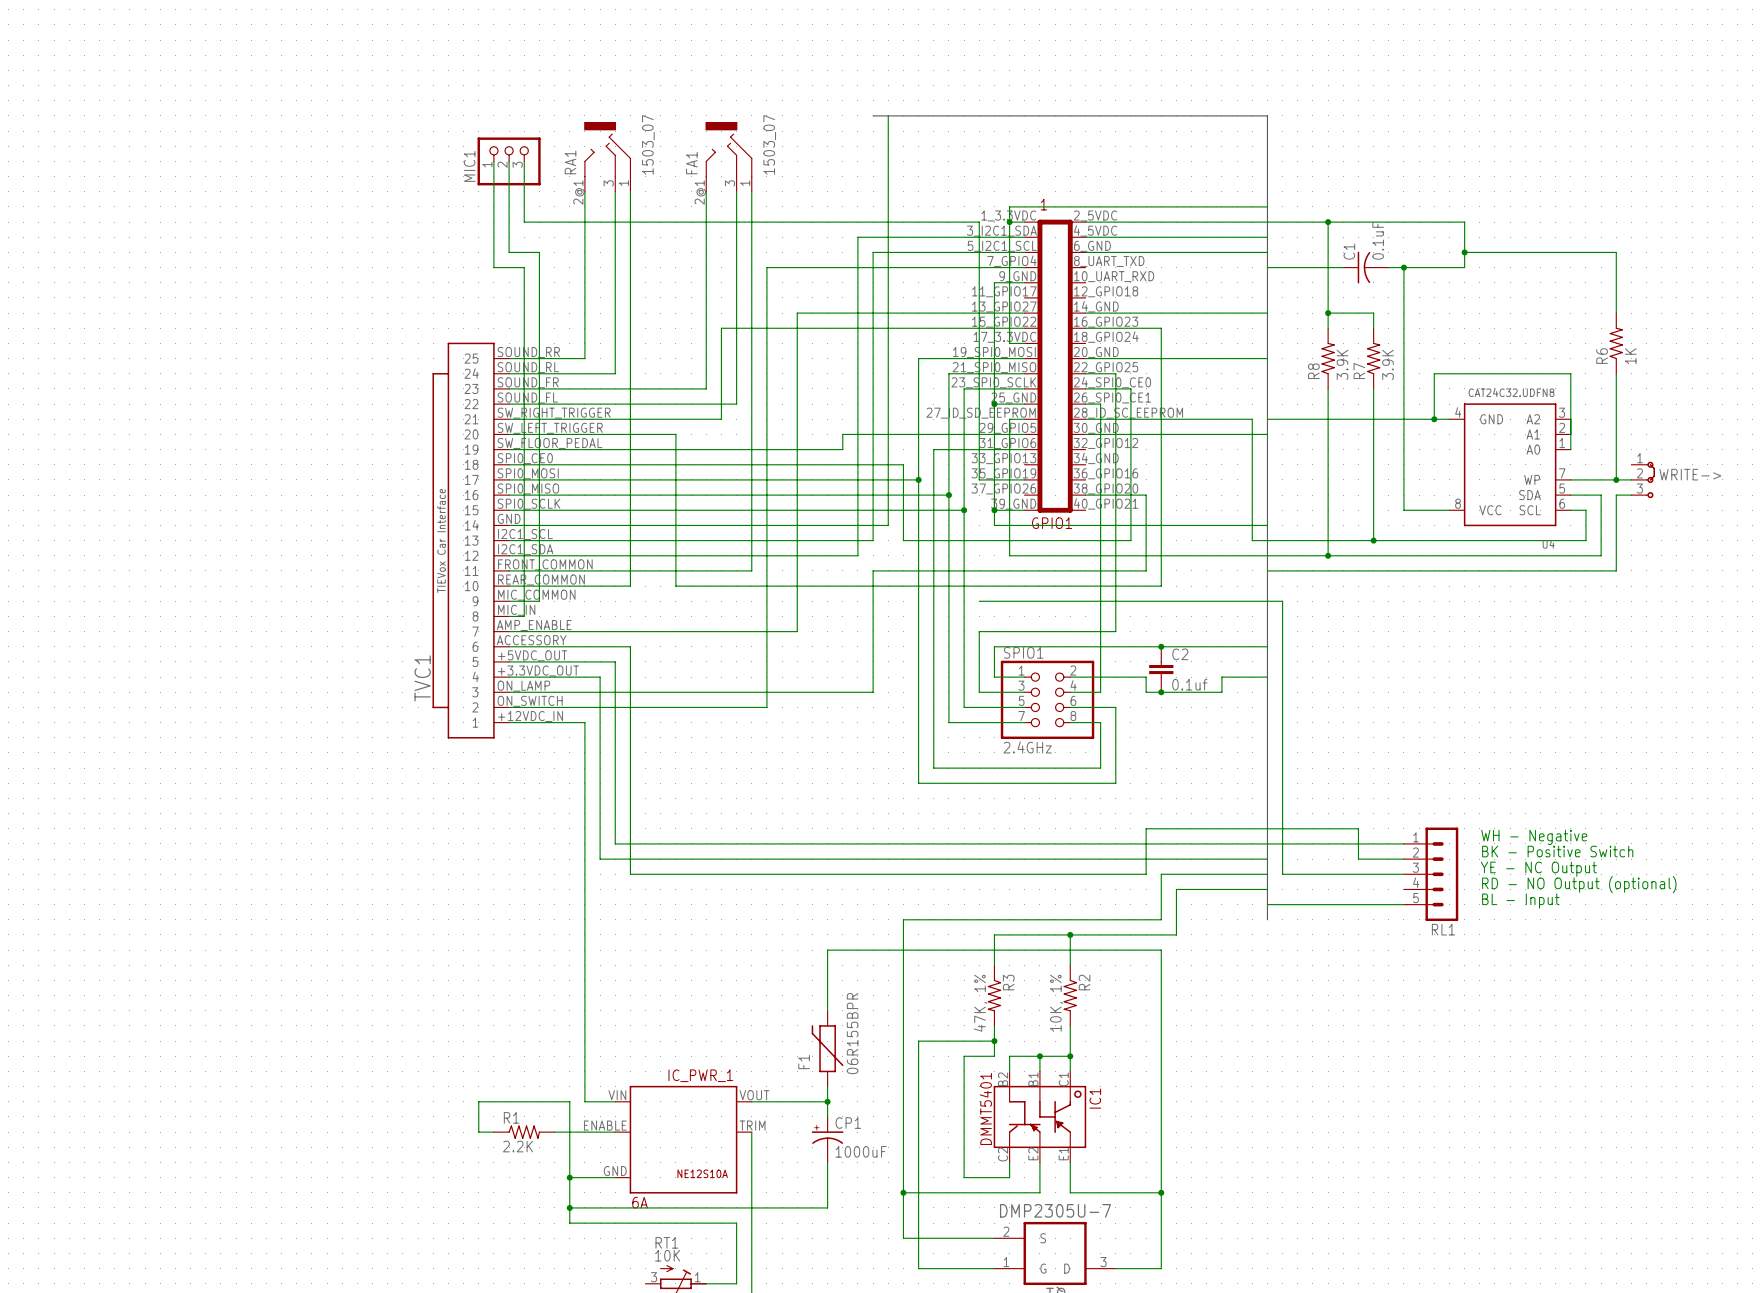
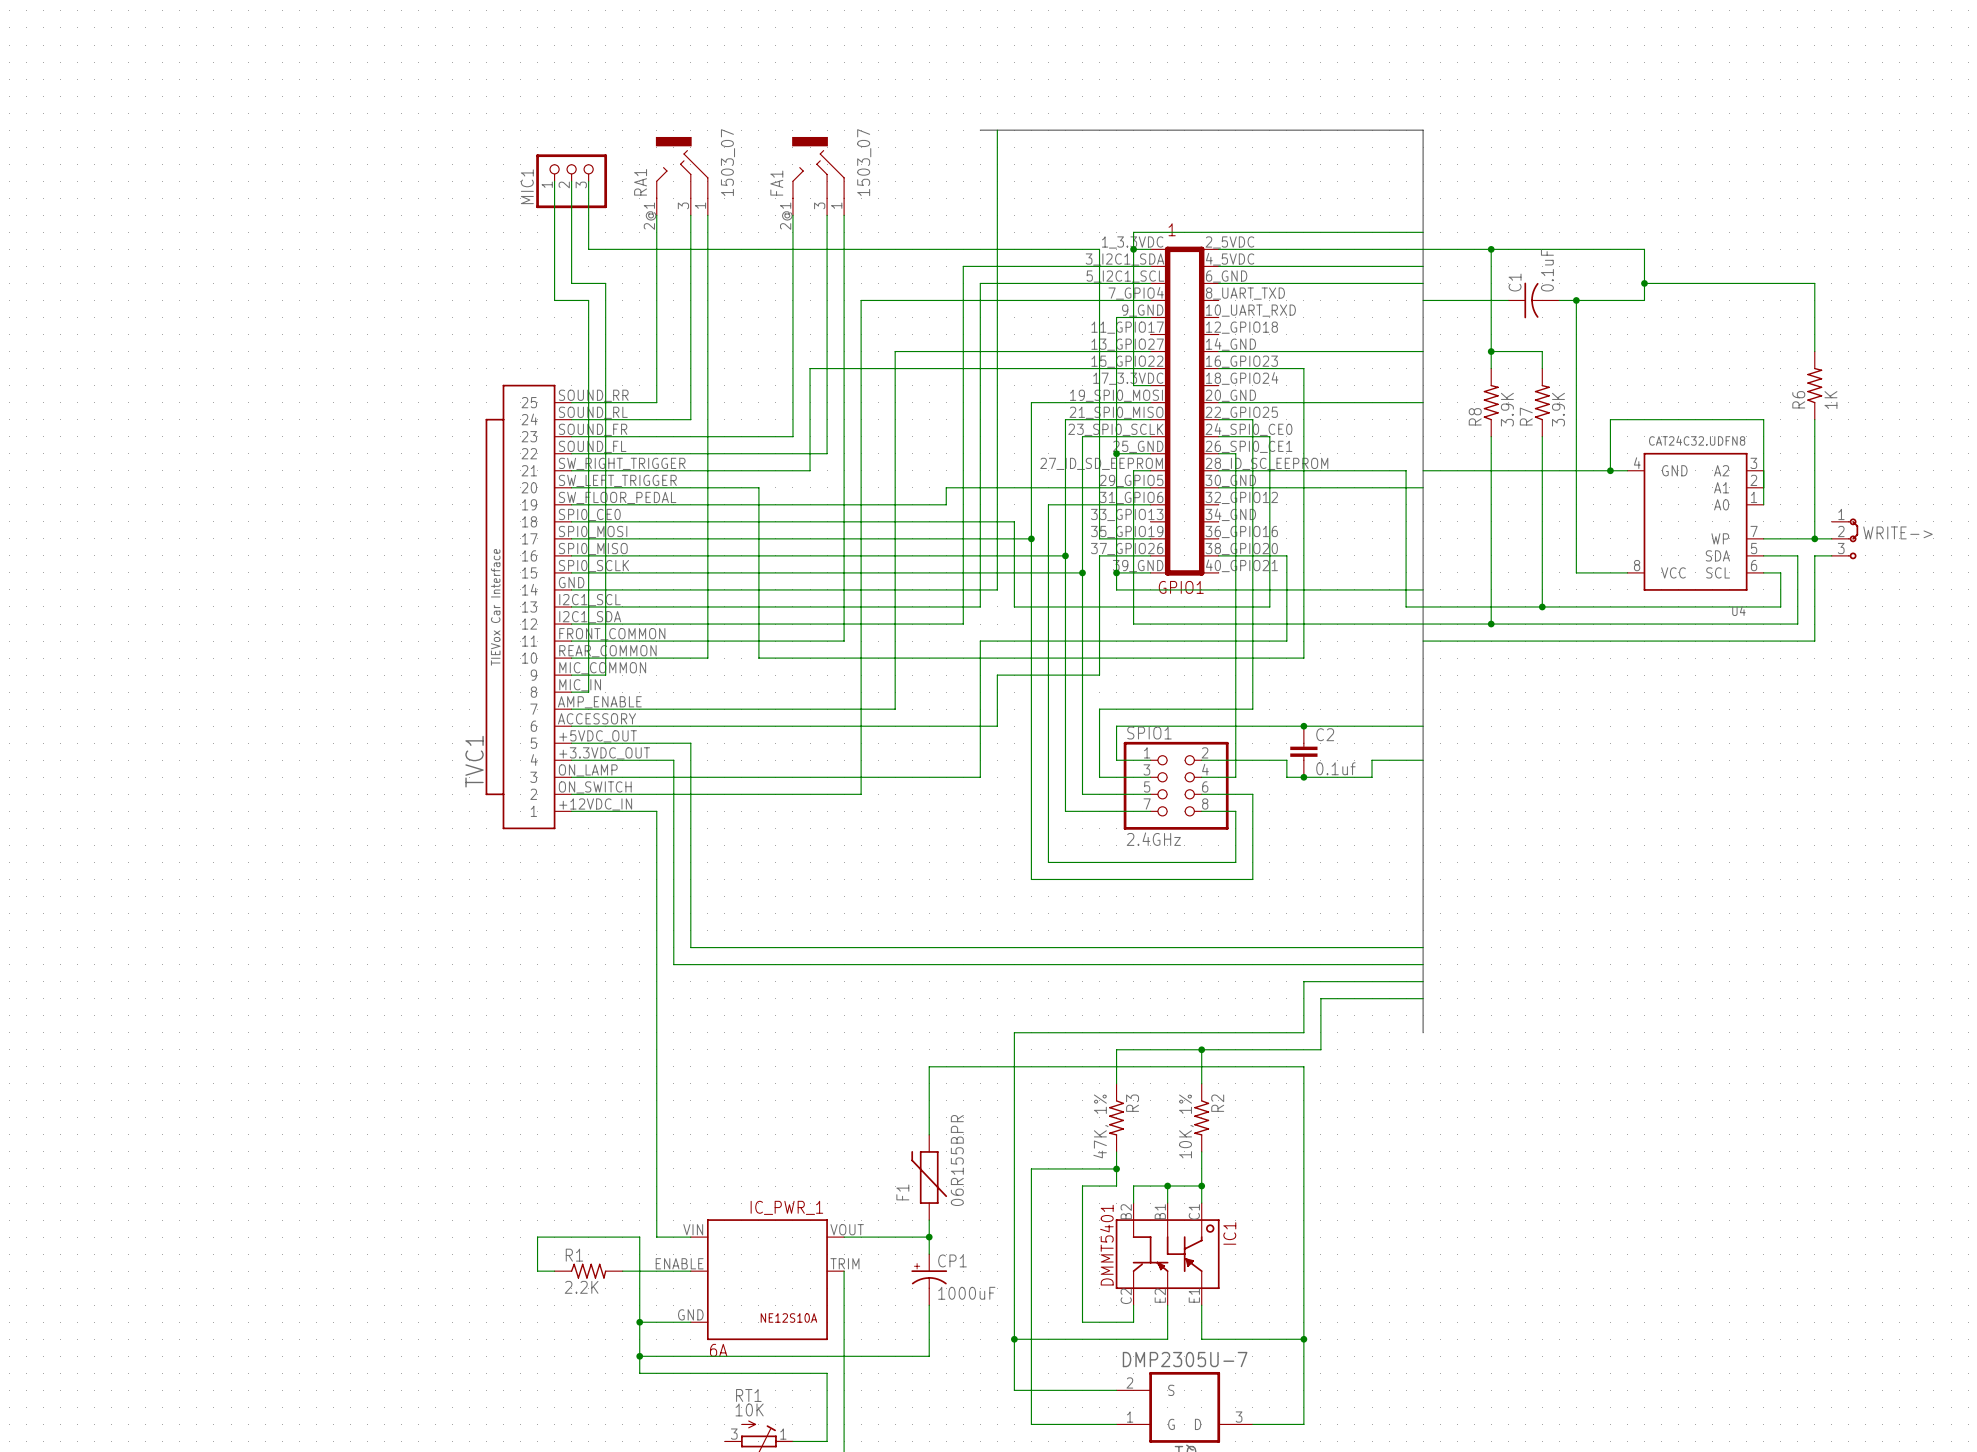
wire: (979, 601) (1282, 601) (1282, 874) (1403, 874) -> none
wire: (630, 646) (630, 874) (1146, 874) (1146, 828) (1358, 828) (1358, 859) (1403, 859) -> (707, 726) (997, 726) (997, 675) (1099, 675) (1099, 555) (1150, 555)
text: WH - Negative (1534, 837) -> none
wire: (1267, 843) (1403, 843) -> none
text: BK - Positive Switch (1557, 851) -> none
text: YE - NC Output (1538, 869) -> none
RL1: (1431, 874) -> none
text: RD - NO Output (optional) (1579, 884) -> none
text: BL - Input (1520, 901) -> none
wire: (1267, 904) (1403, 904) -> none

